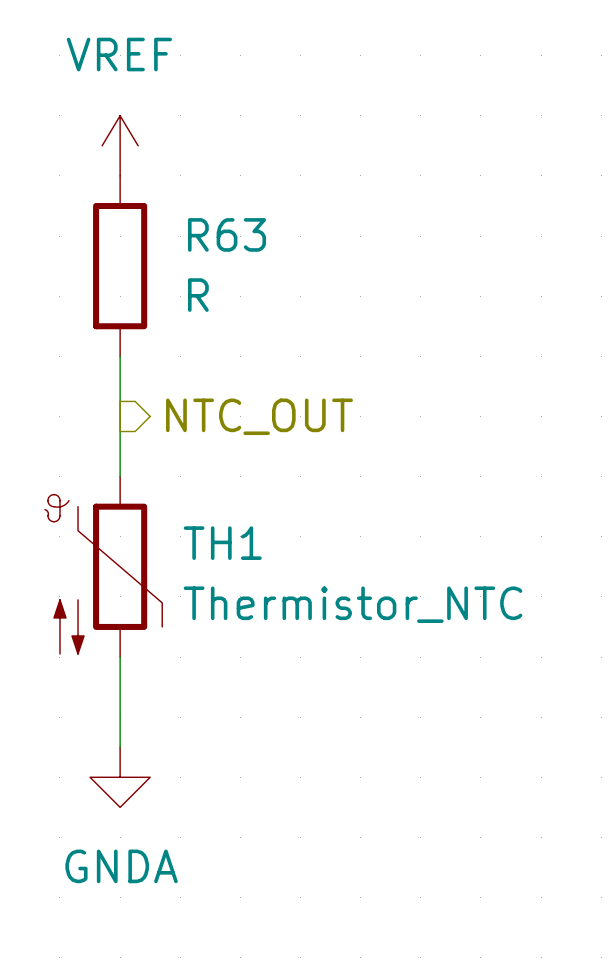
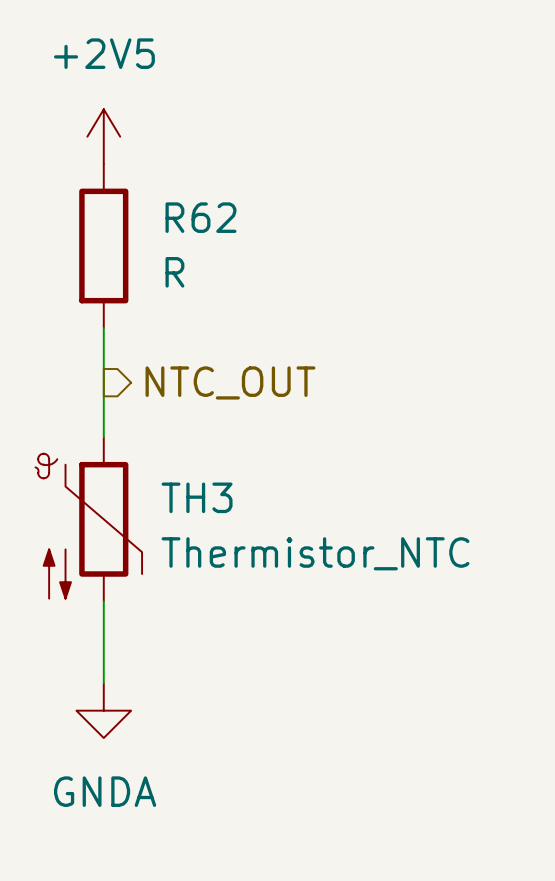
power symbol: VREF (120, 145) -> +2V5 (103, 136)
R63 name: R63 (227, 234) -> R62 (200, 217)
TH1 name: TH1 (222, 543) -> TH3 (197, 497)

